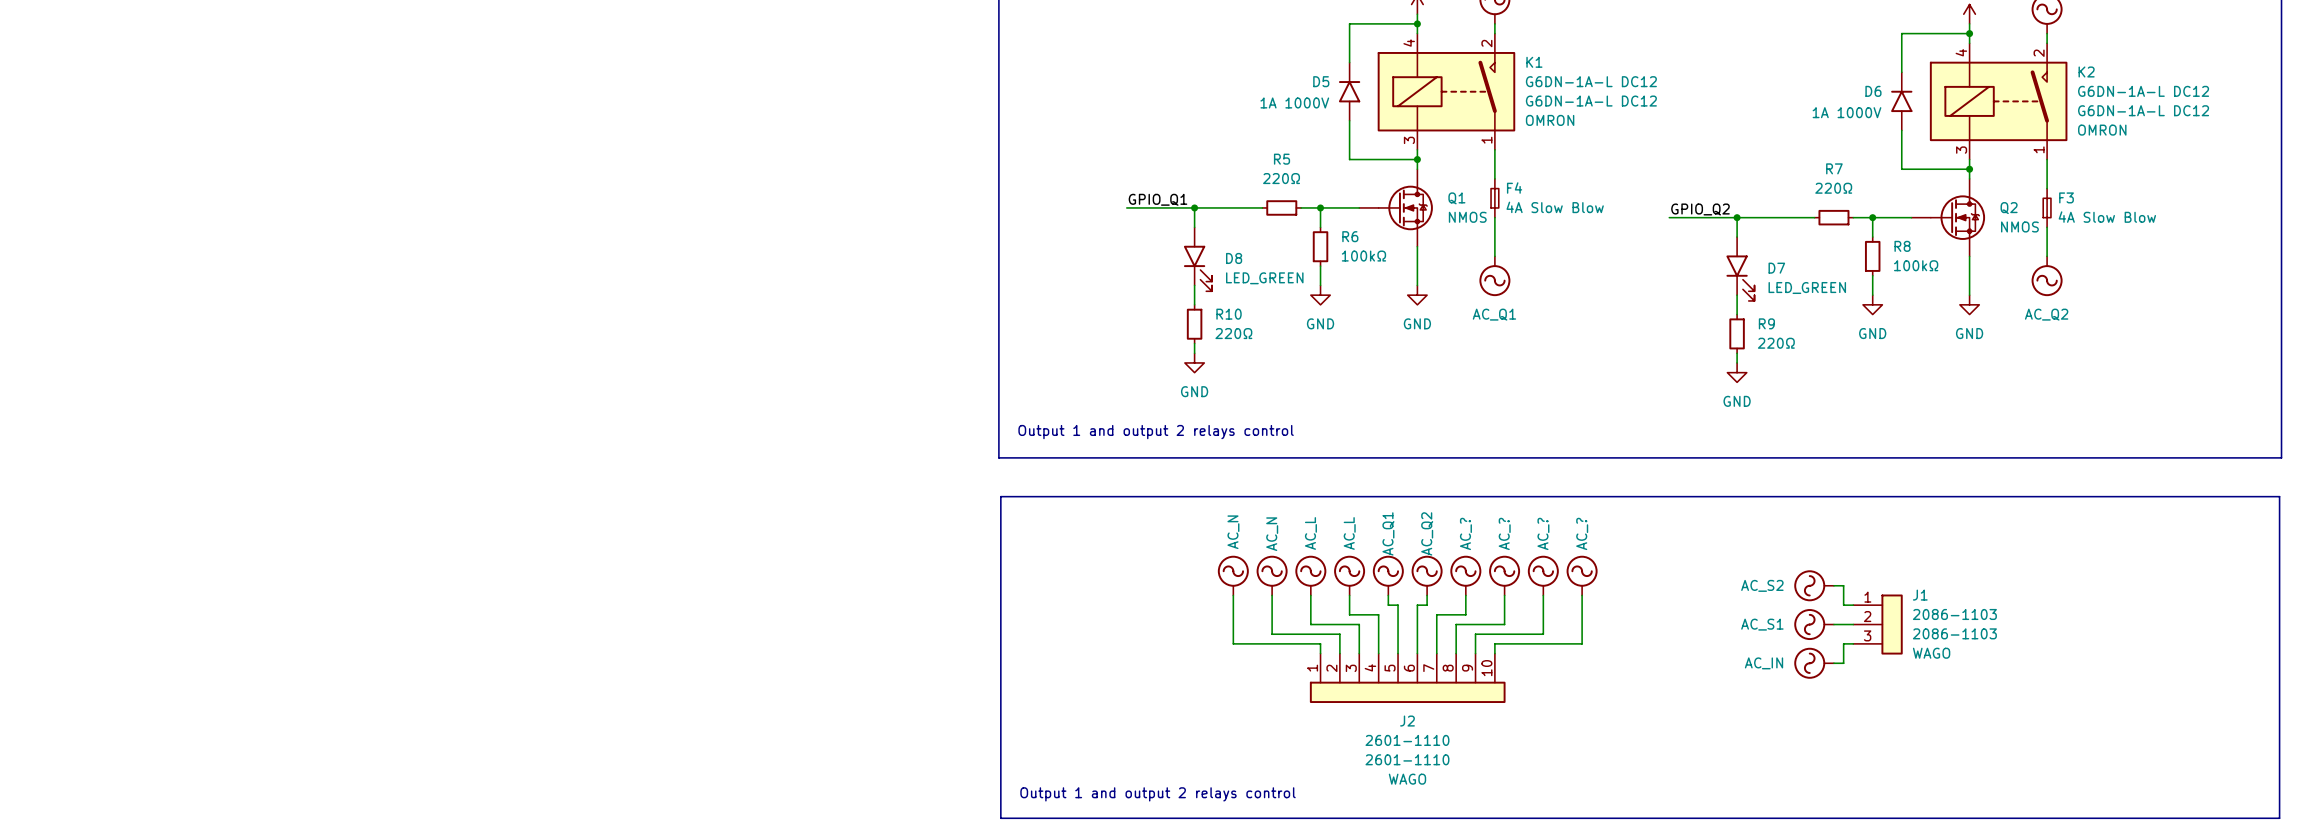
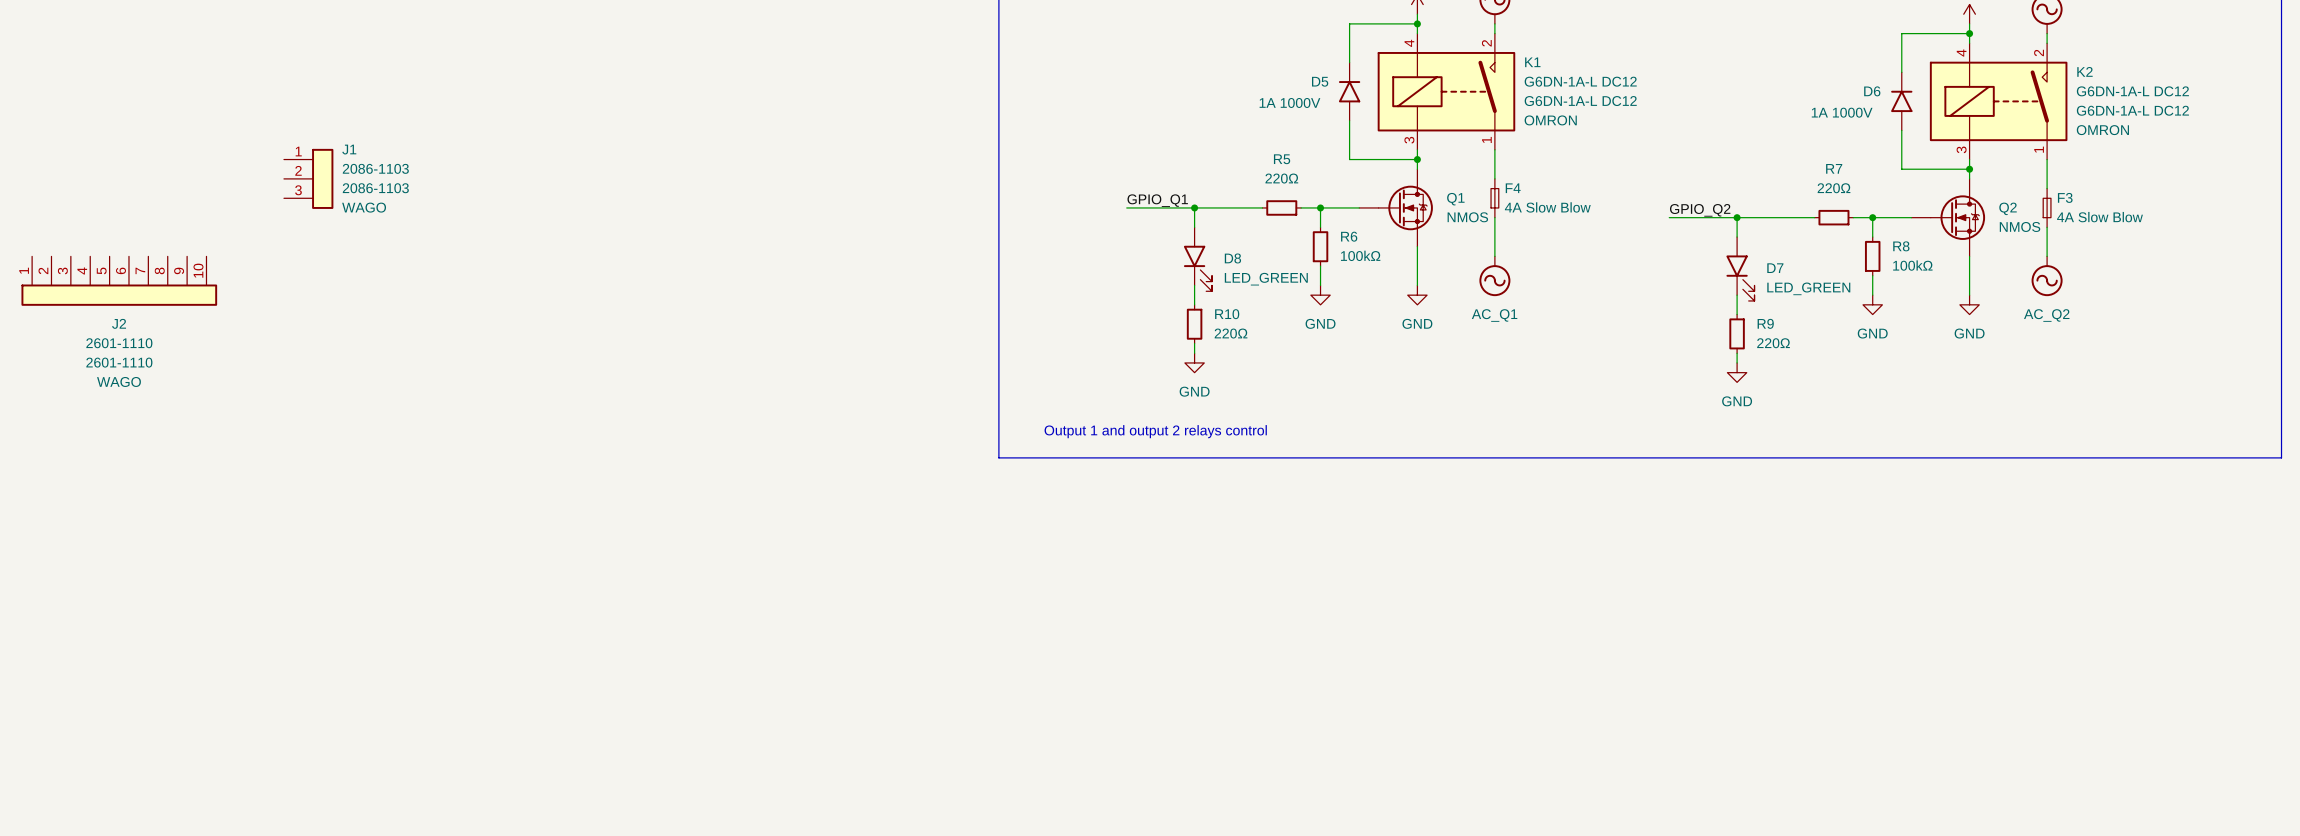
line: (1000, 496) (2279, 496) (2279, 818) (1000, 818) (1000, 496) -> none
power symbol: AC_N (1233, 575) -> none
power symbol: AC_N (1272, 575) -> none
power symbol: AC_L (1310, 575) -> none
power symbol: AC_L (1349, 575) -> none
power symbol: AC_Q1 (1388, 575) -> none
power symbol: AC_Q2 (1427, 575) -> none
power symbol: AC_? (1465, 575) -> none
power symbol: AC_? (1504, 575) -> none
power symbol: AC_? (1543, 575) -> none
power symbol: AC_? (1582, 575) -> none
power symbol: AC_S2 (1814, 585) -> none
wire: (1833, 585) (1843, 585) (1843, 605) (1853, 605) -> none
wire: (1233, 595) (1233, 643) (1320, 643) (1320, 653) -> none
wire: (1272, 595) (1272, 634) (1339, 634) (1339, 653) -> none
wire: (1310, 595) (1310, 624) (1359, 624) (1359, 653) -> none
wire: (1349, 595) (1349, 614) (1378, 614) (1378, 653) -> none
wire: (1388, 595) (1388, 605) (1398, 605) (1398, 653) -> none
wire: (1427, 595) (1427, 605) (1417, 605) (1417, 653) -> none
wire: (1465, 595) (1465, 614) (1436, 614) (1436, 653) -> none
wire: (1504, 595) (1504, 624) (1456, 624) (1456, 653) -> none
wire: (1543, 595) (1543, 634) (1475, 634) (1475, 653) -> none
wire: (1582, 595) (1582, 643) (1494, 643) (1494, 653) -> none
power symbol: AC_S1 (1814, 624) -> none
wire: (1833, 624) (1853, 624) -> none
J1 position: (1878, 624) -> (308, 178)
wire: (1853, 643) (1843, 643) (1843, 663) (1833, 663) -> none
power symbol: AC_IN (1814, 663) -> none
J2 position: (1407, 678) -> (119, 281)
text: Output 1 and output 2 relays control (1158, 794) -> none

